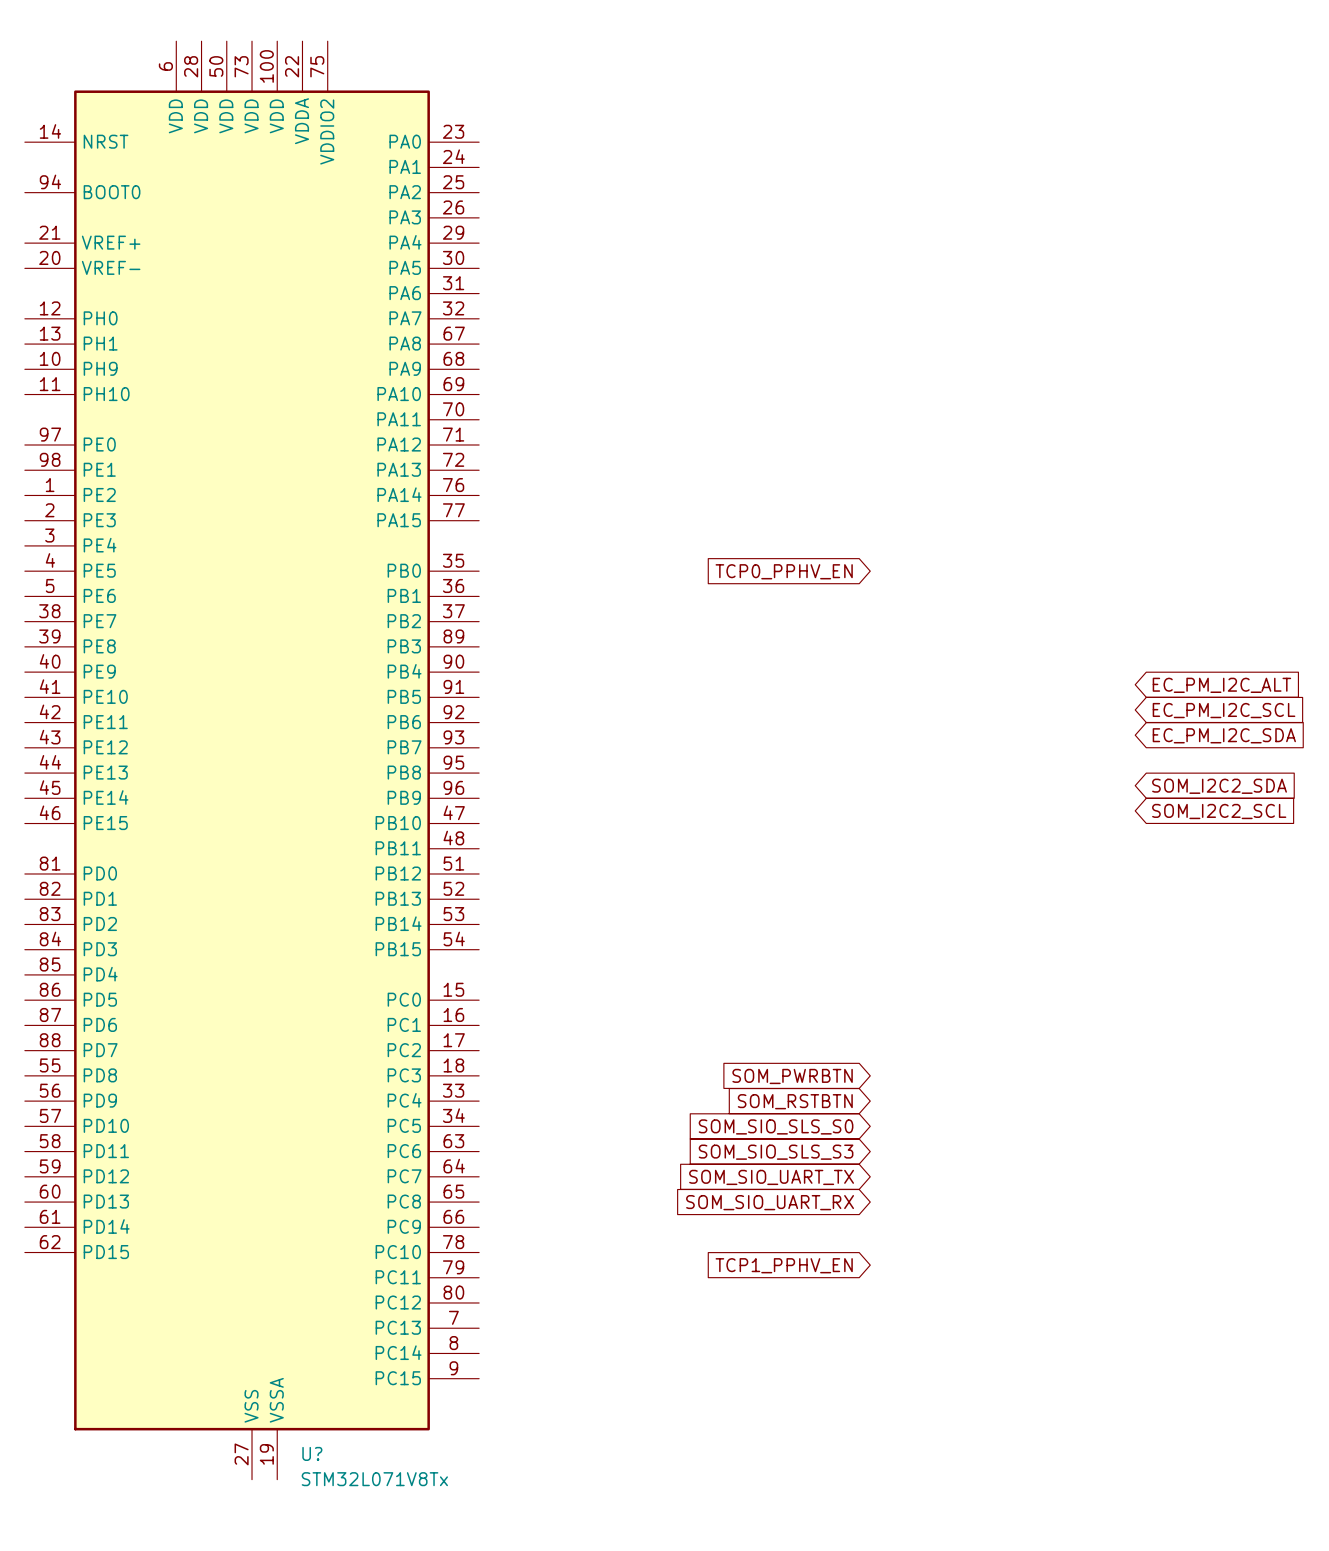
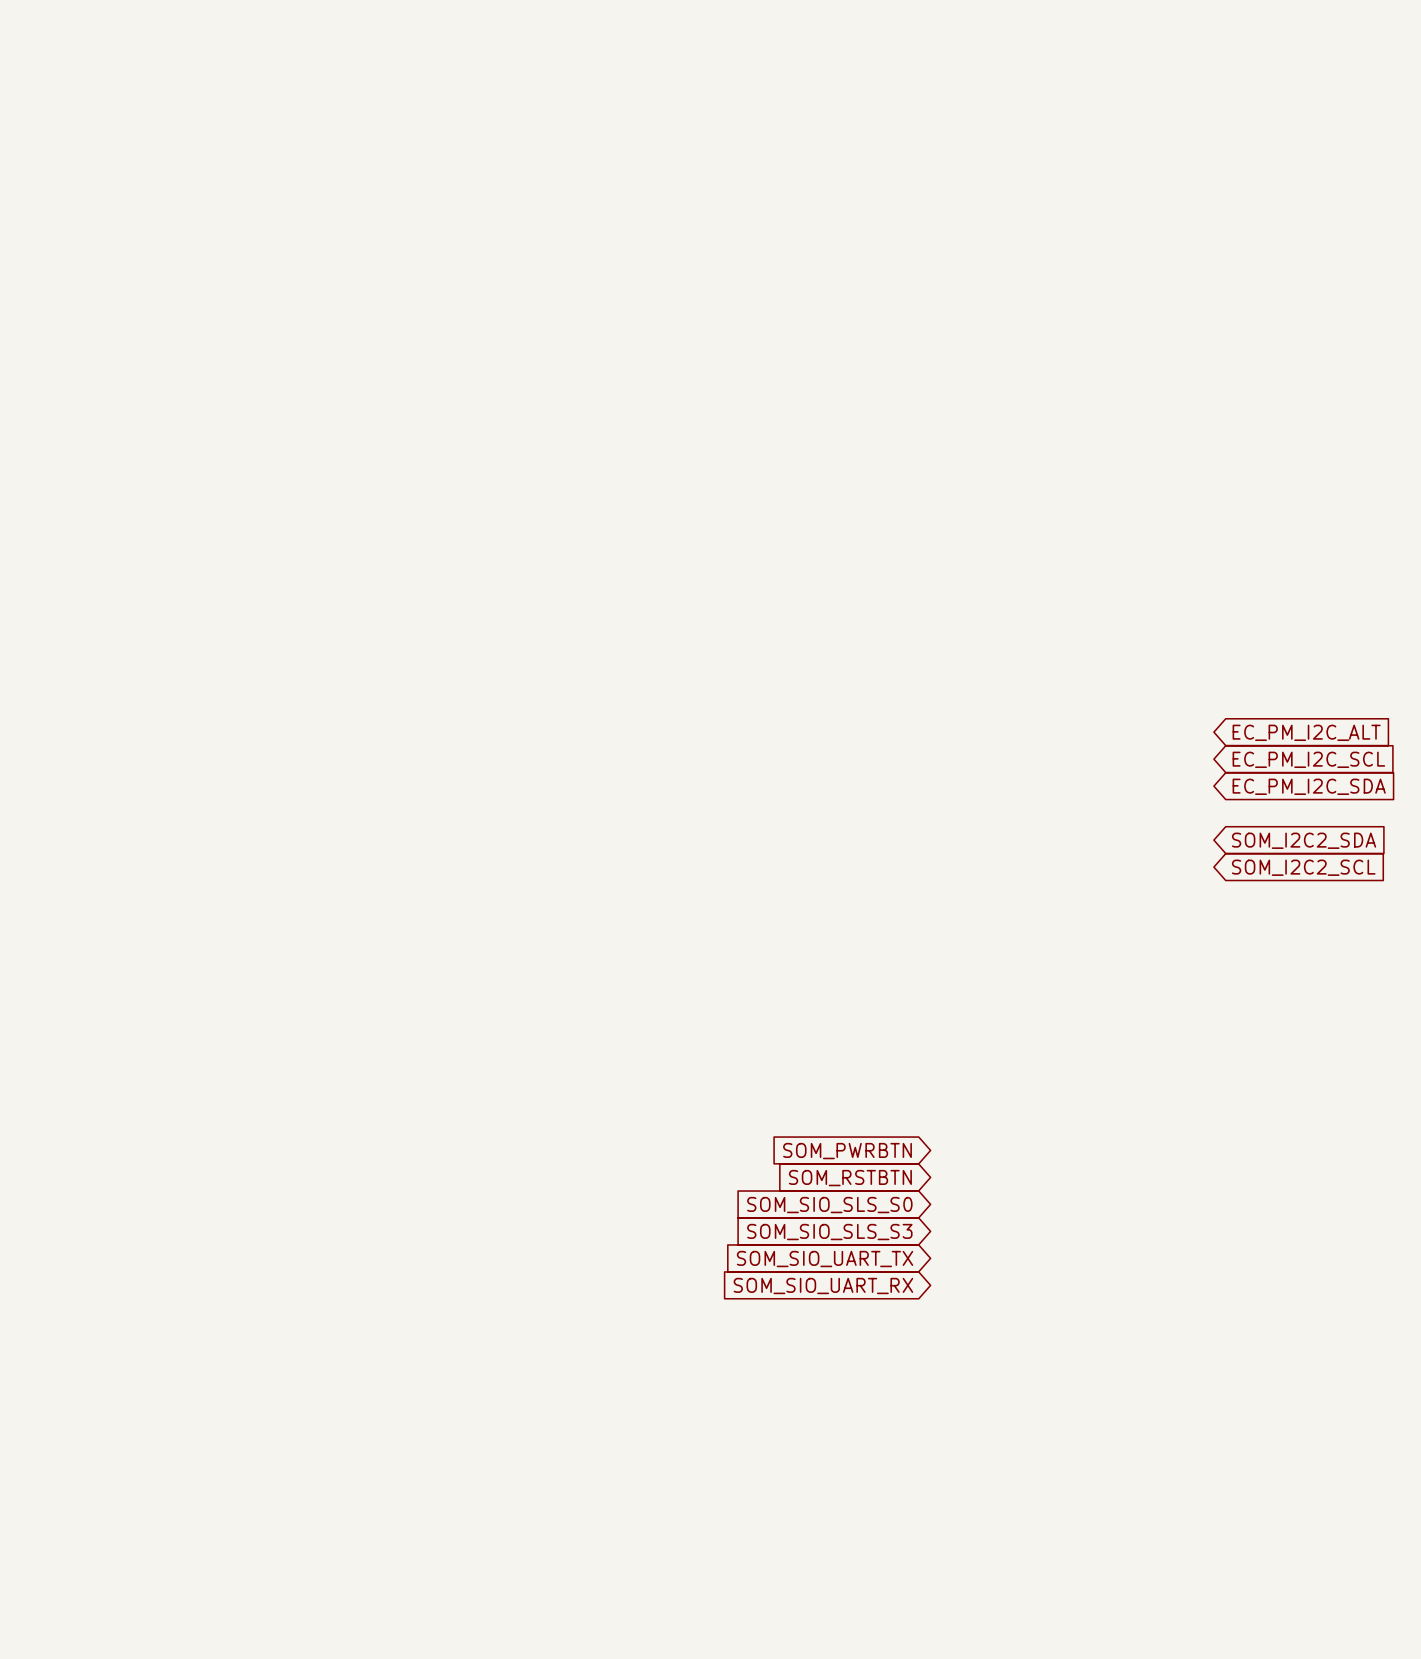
global label: TCP0_PPHV_EN (784, 571) -> none
U?: STM32L071V8Tx (252, 760) -> none
global label: TCP1_PPHV_EN (784, 1265) -> none

